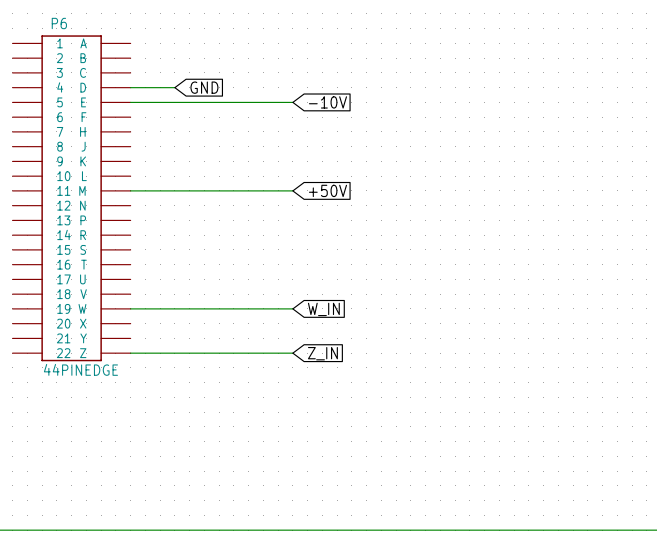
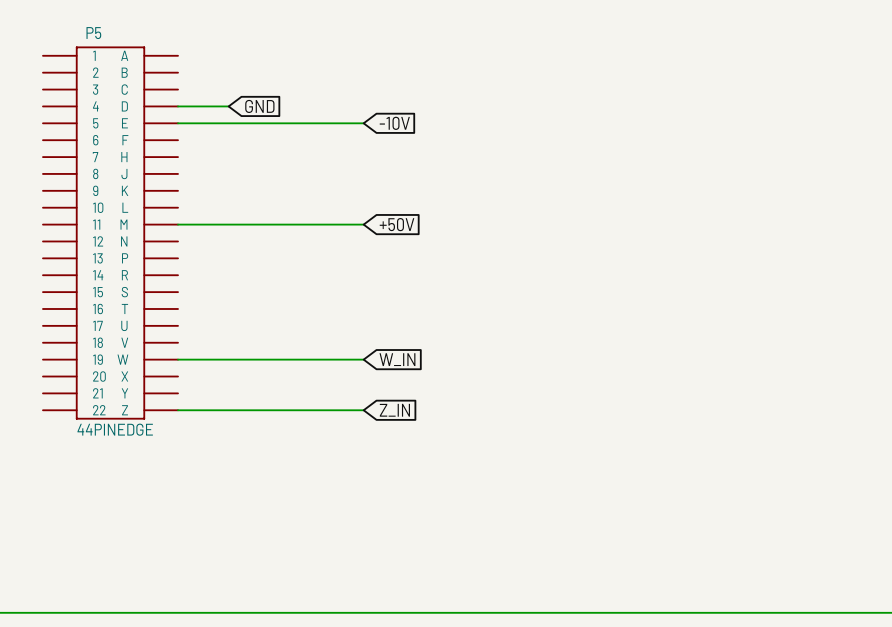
P6 name: P6 (59, 23) -> P5 (93, 33)

